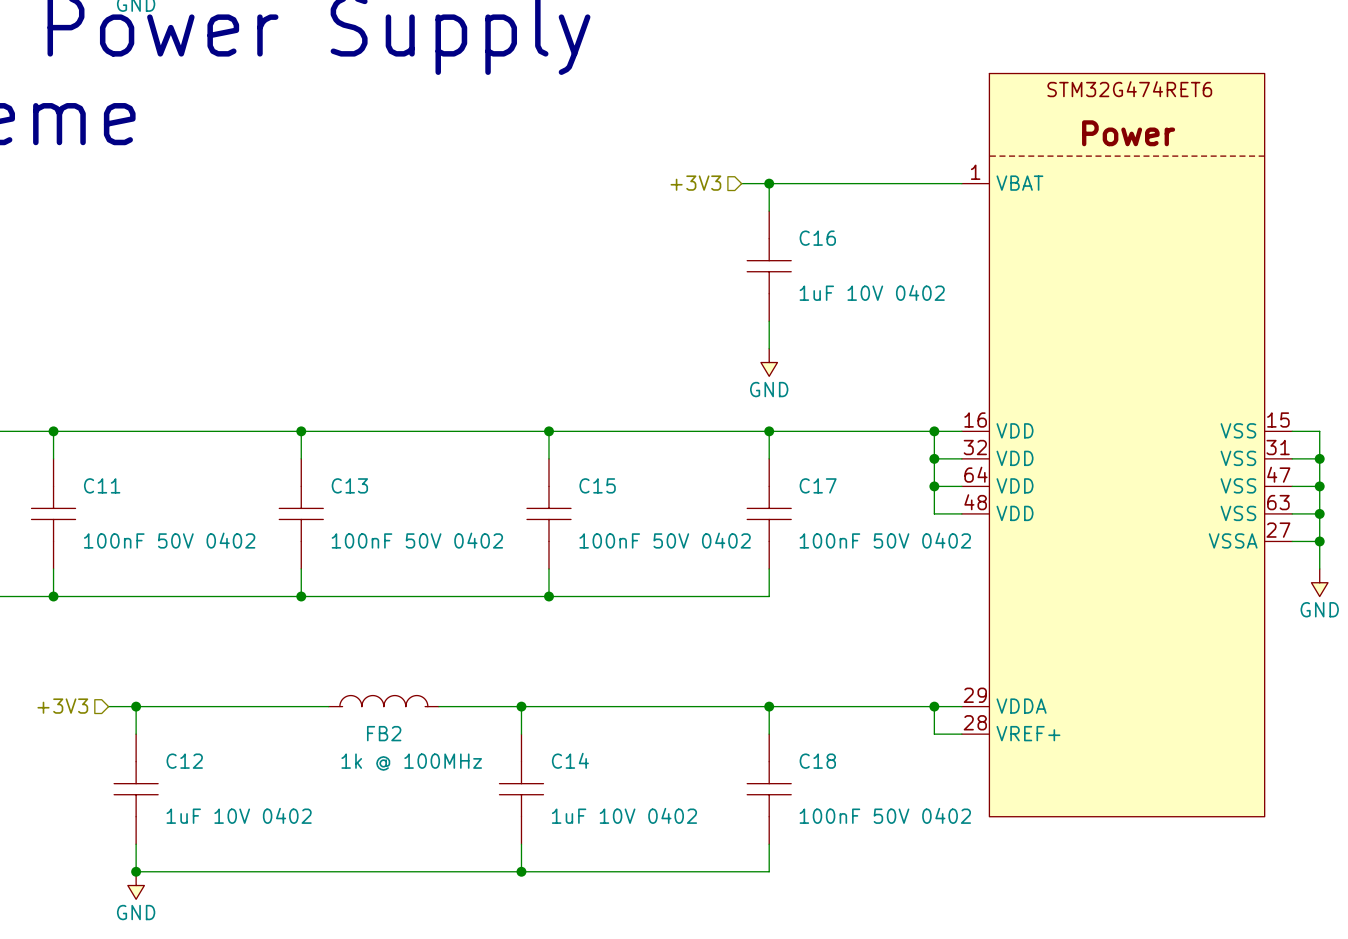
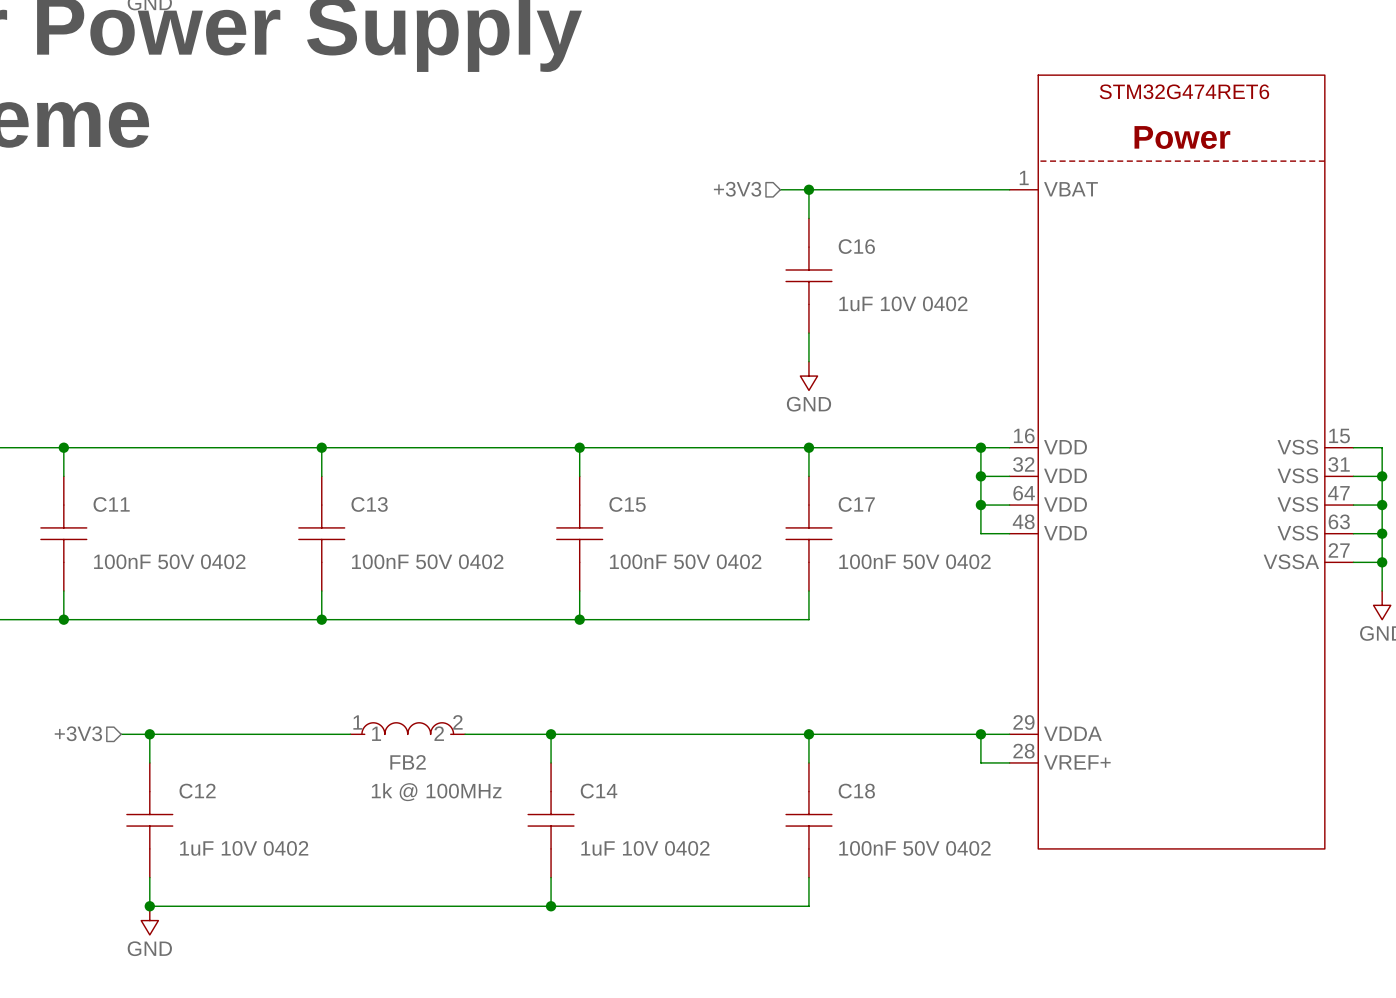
FB2 pin number: none -> 1 (357, 722)
FB2 pin number: none -> 2 (457, 722)
FB2 pin name: none -> 1 (376, 733)
FB2 pin name: none -> 2 (439, 733)

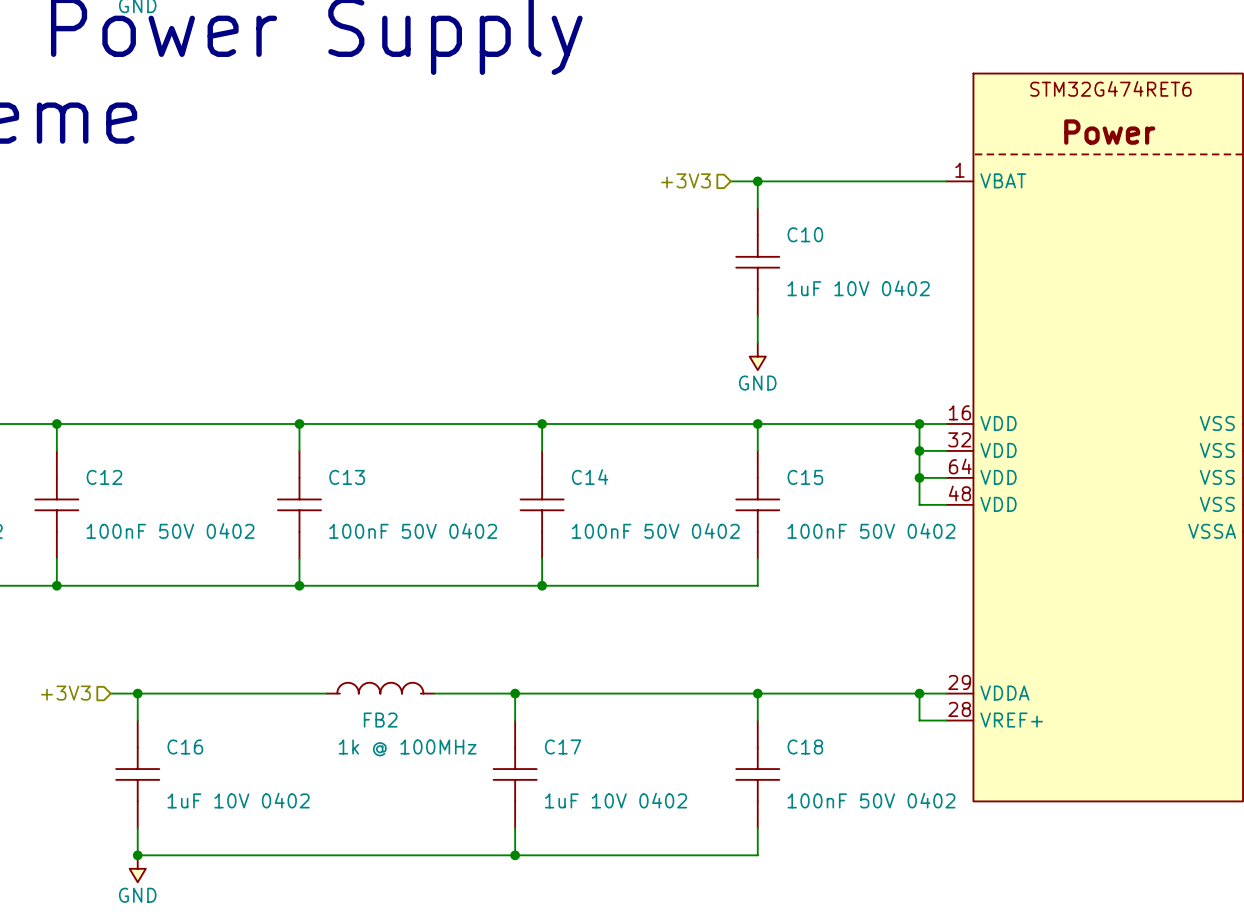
C16 name: C16 (856, 246) -> C10 (805, 234)
C11 name: C11 (111, 504) -> C12 (104, 477)
C15 name: C15 (627, 504) -> C14 (590, 477)
C17 name: C17 (856, 504) -> C15 (805, 477)
FB2 pin number: 1 (357, 722) -> none
FB2 pin number: 2 (457, 722) -> none
FB2 pin name: 1 (376, 733) -> none
FB2 pin name: 2 (439, 733) -> none
C12 name: C12 (197, 791) -> C16 (185, 746)
C14 name: C14 (599, 791) -> C17 (563, 746)

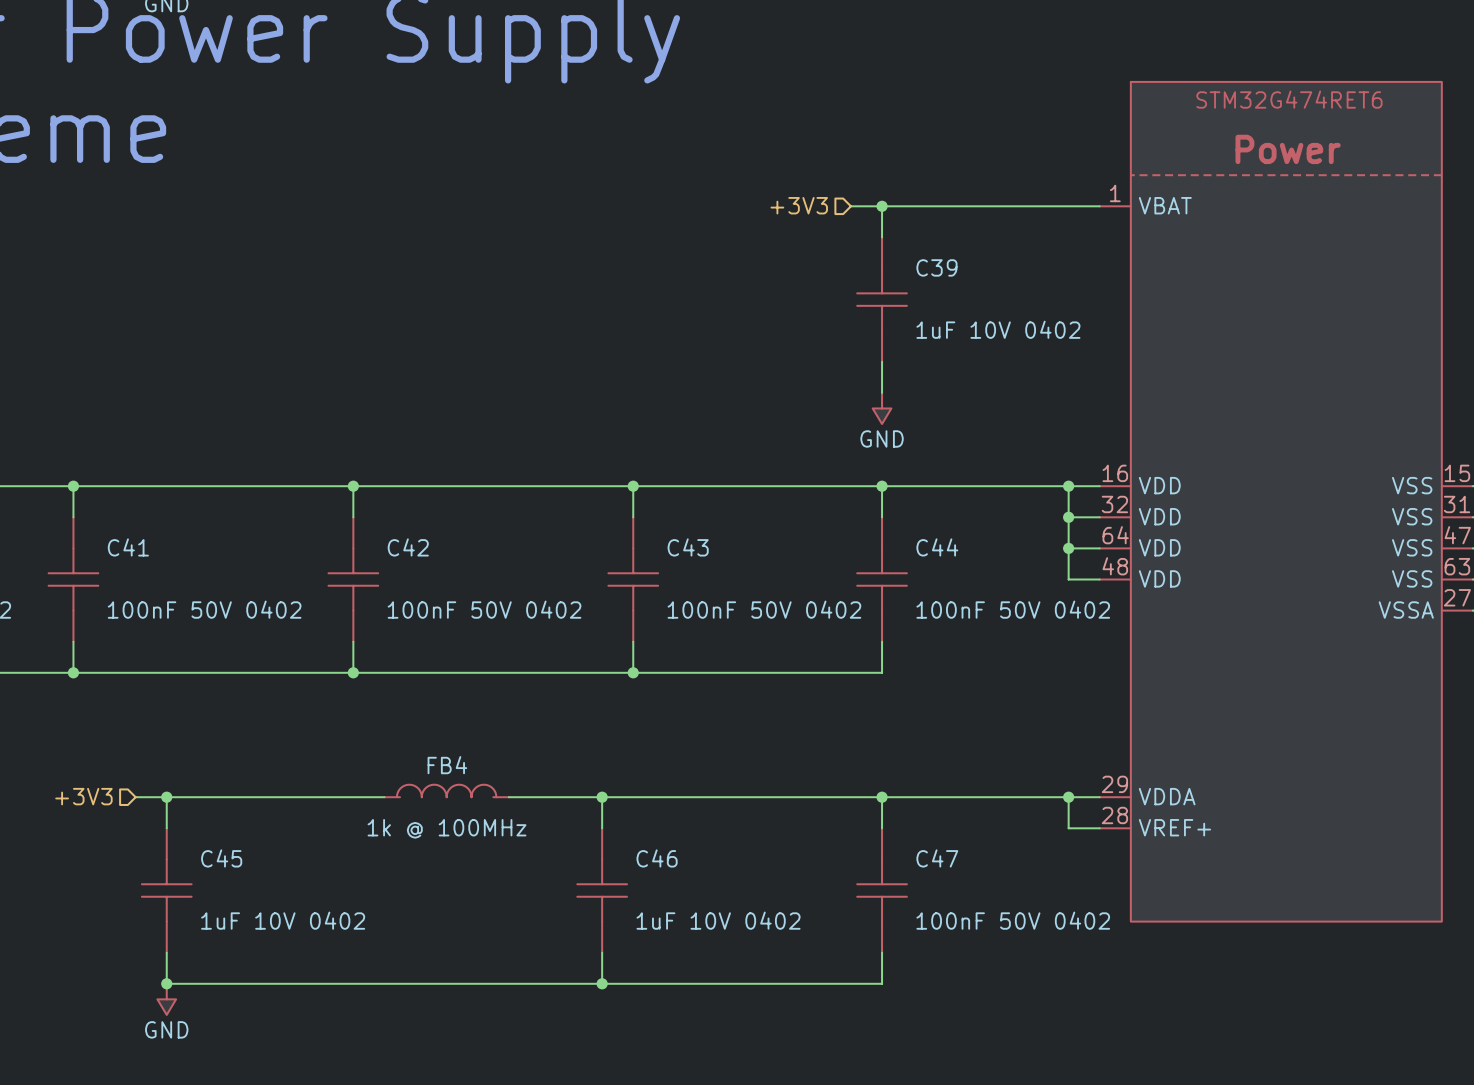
C10 name: C10 (805, 234) -> C39 (936, 267)
C12 name: C12 (104, 477) -> C41 (128, 547)
C13 name: C13 (347, 477) -> C42 (408, 547)
C14 name: C14 (590, 477) -> C43 (688, 547)
C15 name: C15 (805, 477) -> C44 (937, 547)
FB2 name: FB2 (380, 720) -> FB4 (447, 765)
C16 name: C16 (185, 746) -> C45 (221, 858)
C17 name: C17 (563, 746) -> C46 (657, 858)
C18 name: C18 (805, 746) -> C47 (937, 858)
FB2 value position: 1k @ 100MHz (407, 747) -> 1k @ 100MHz (447, 828)

